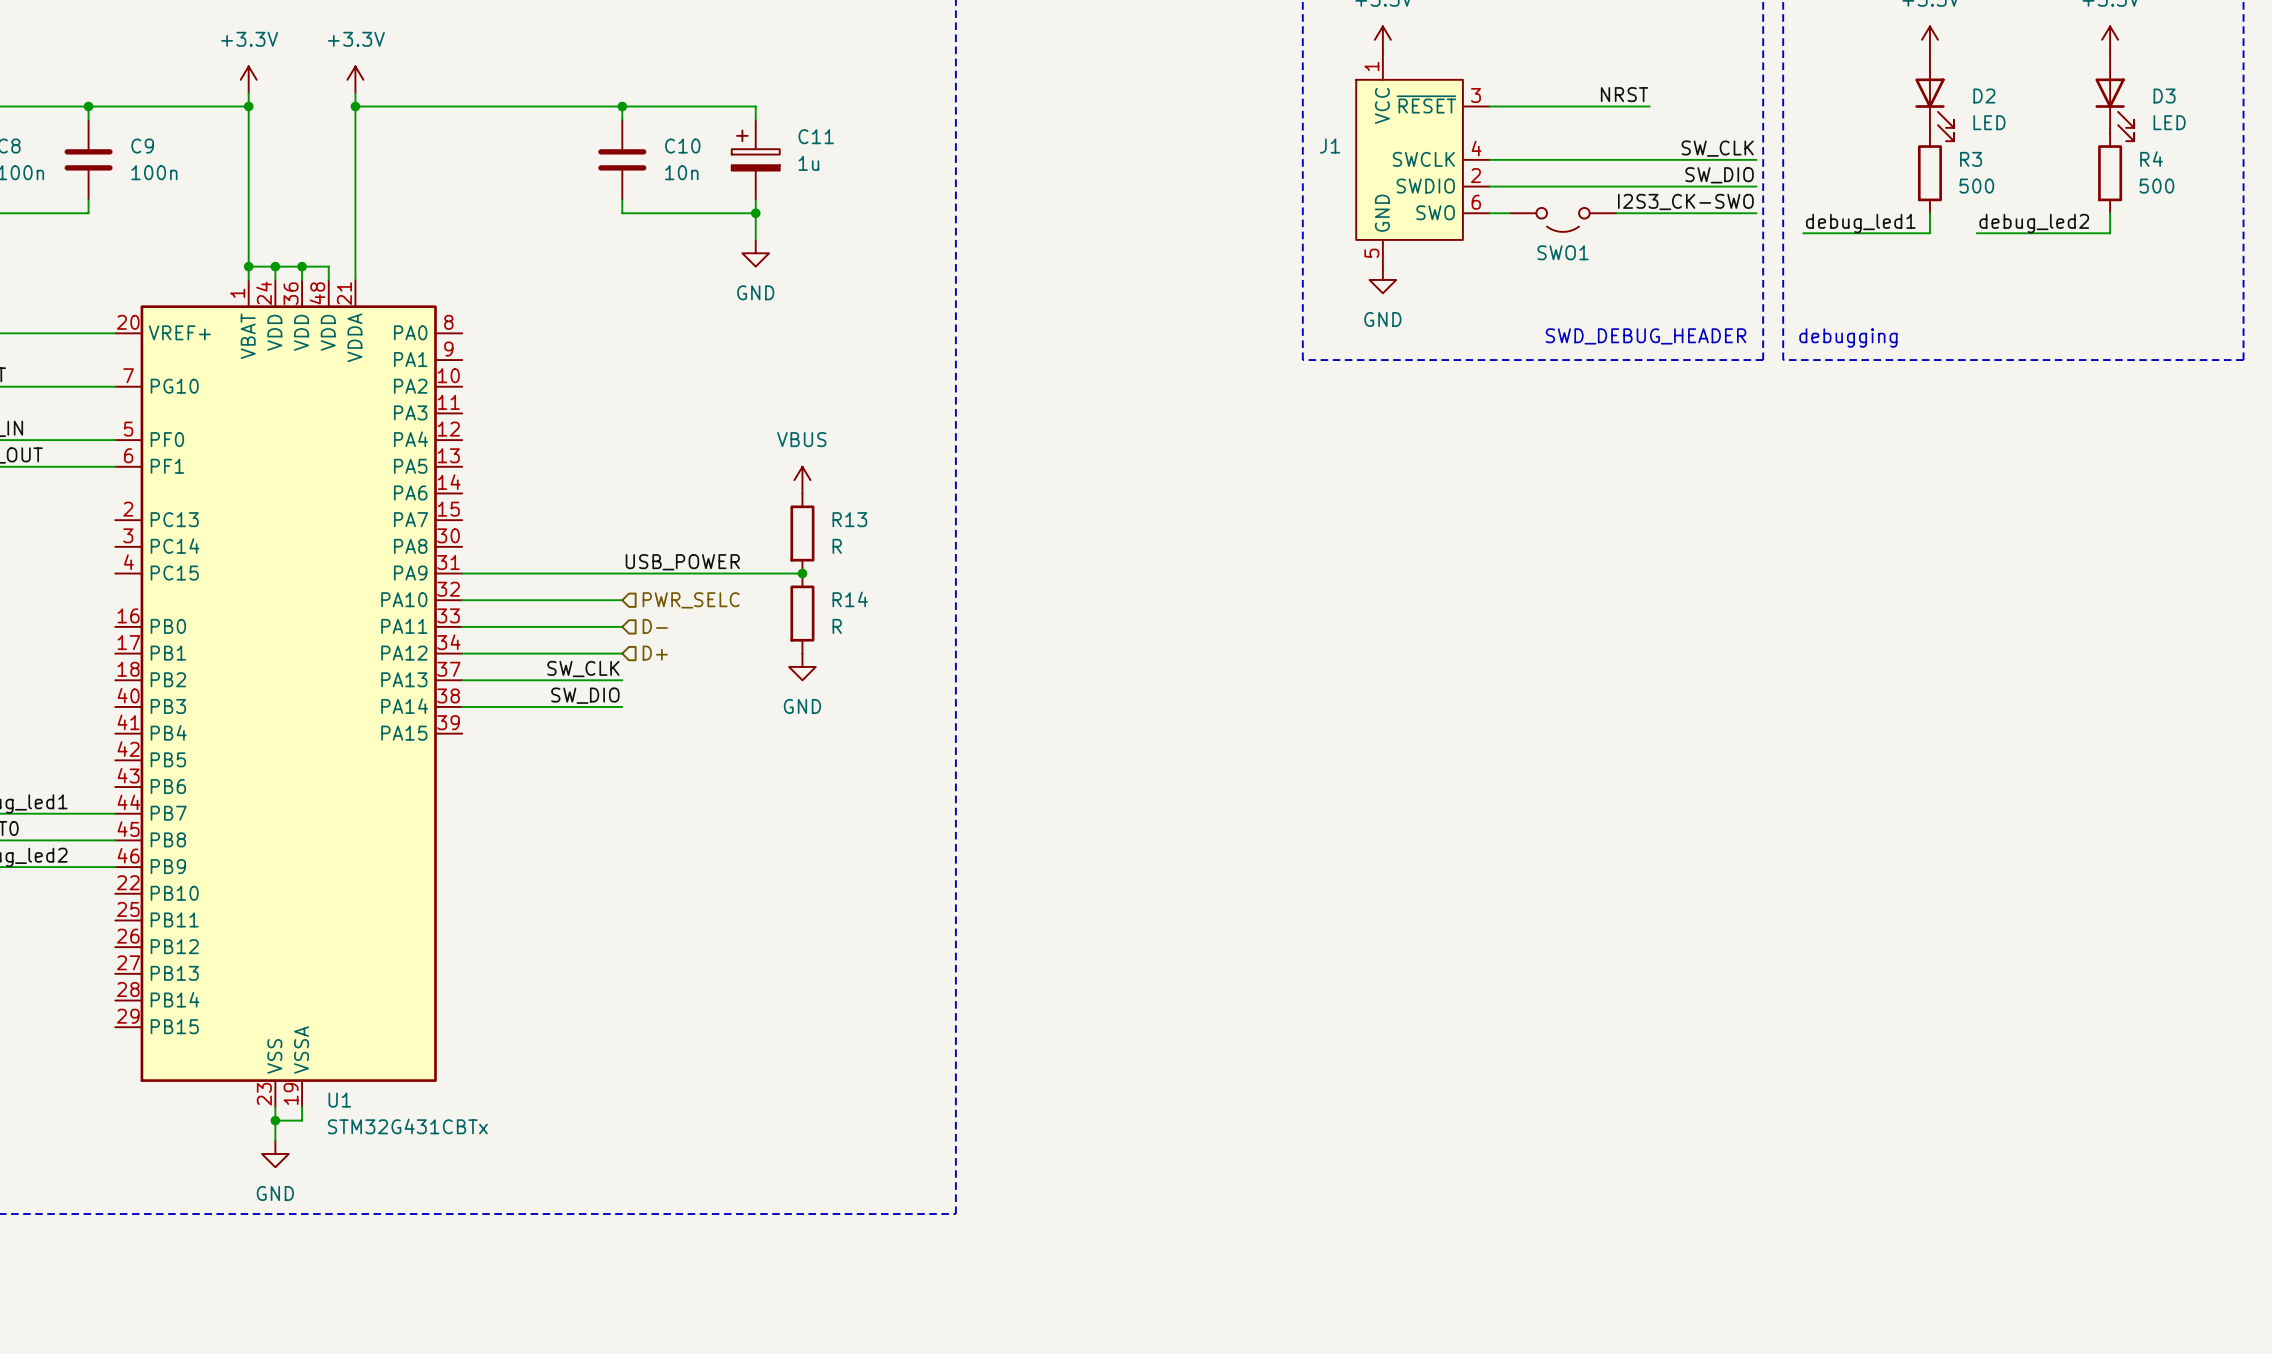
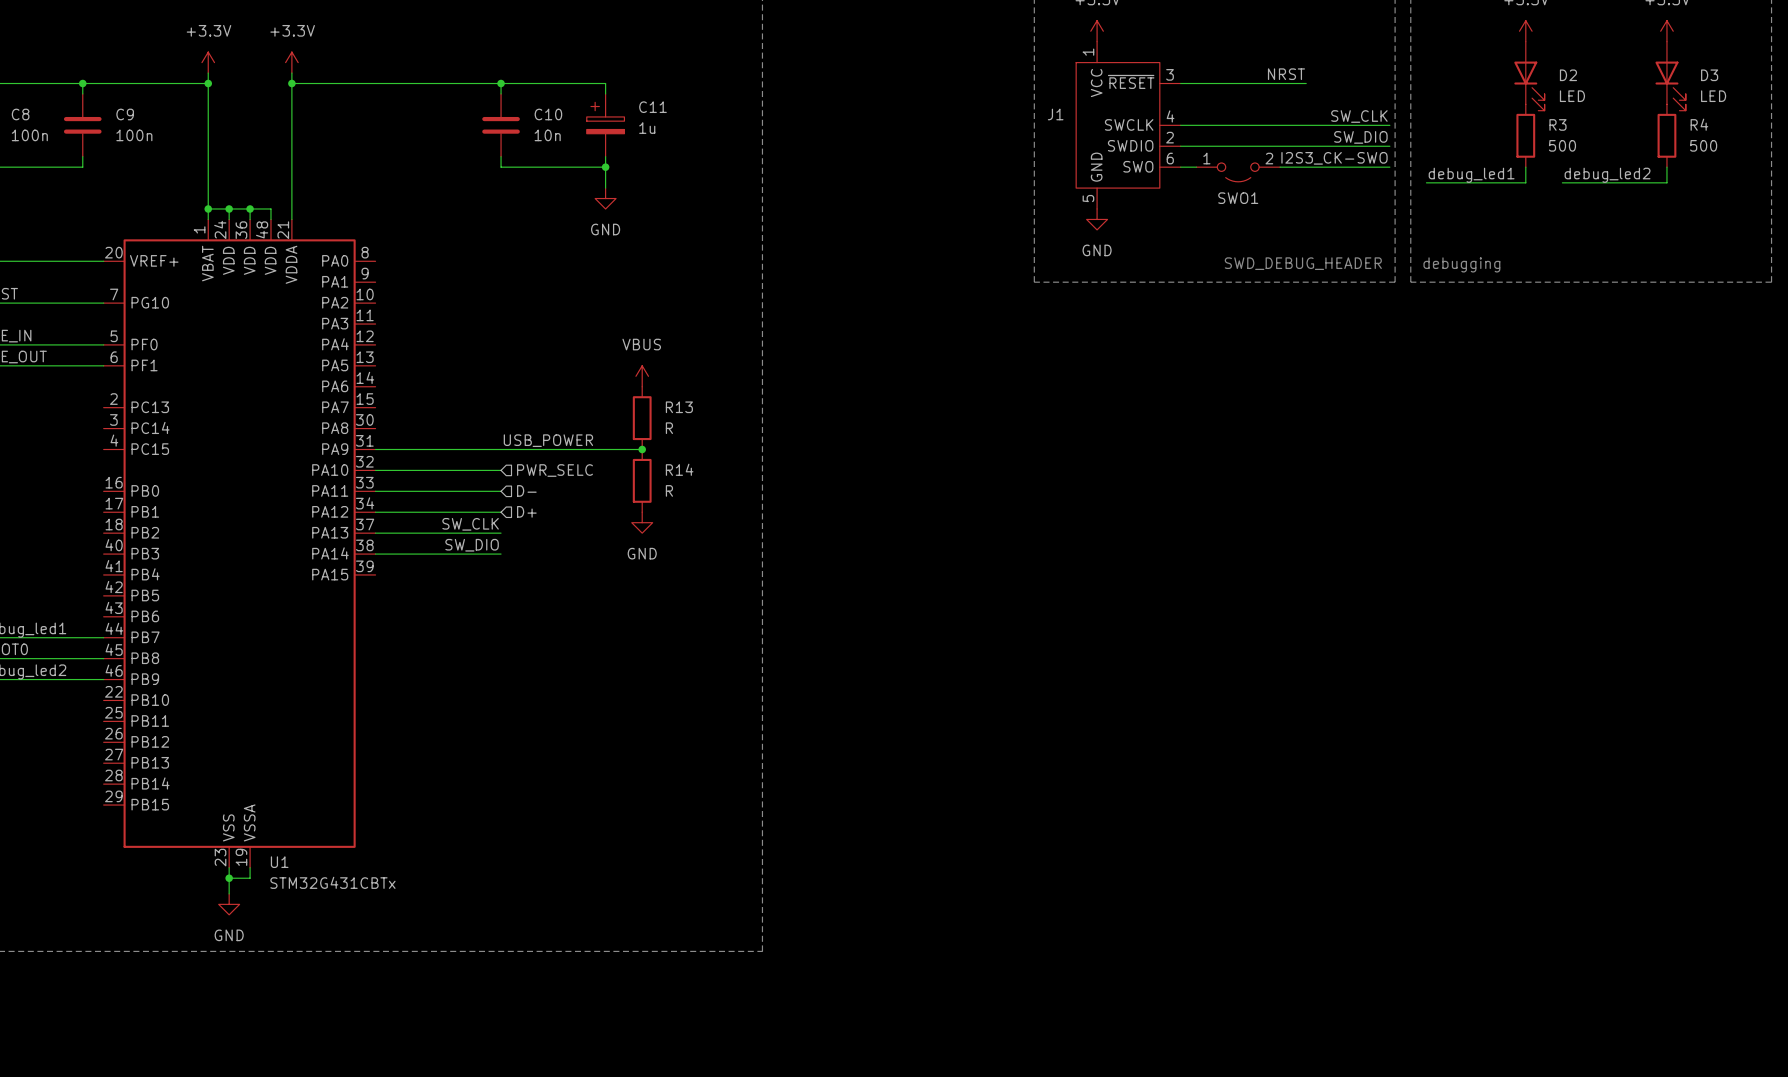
SWO1 pin number: none -> 1 (1206, 158)
SWO1 pin number: none -> 2 (1269, 158)

